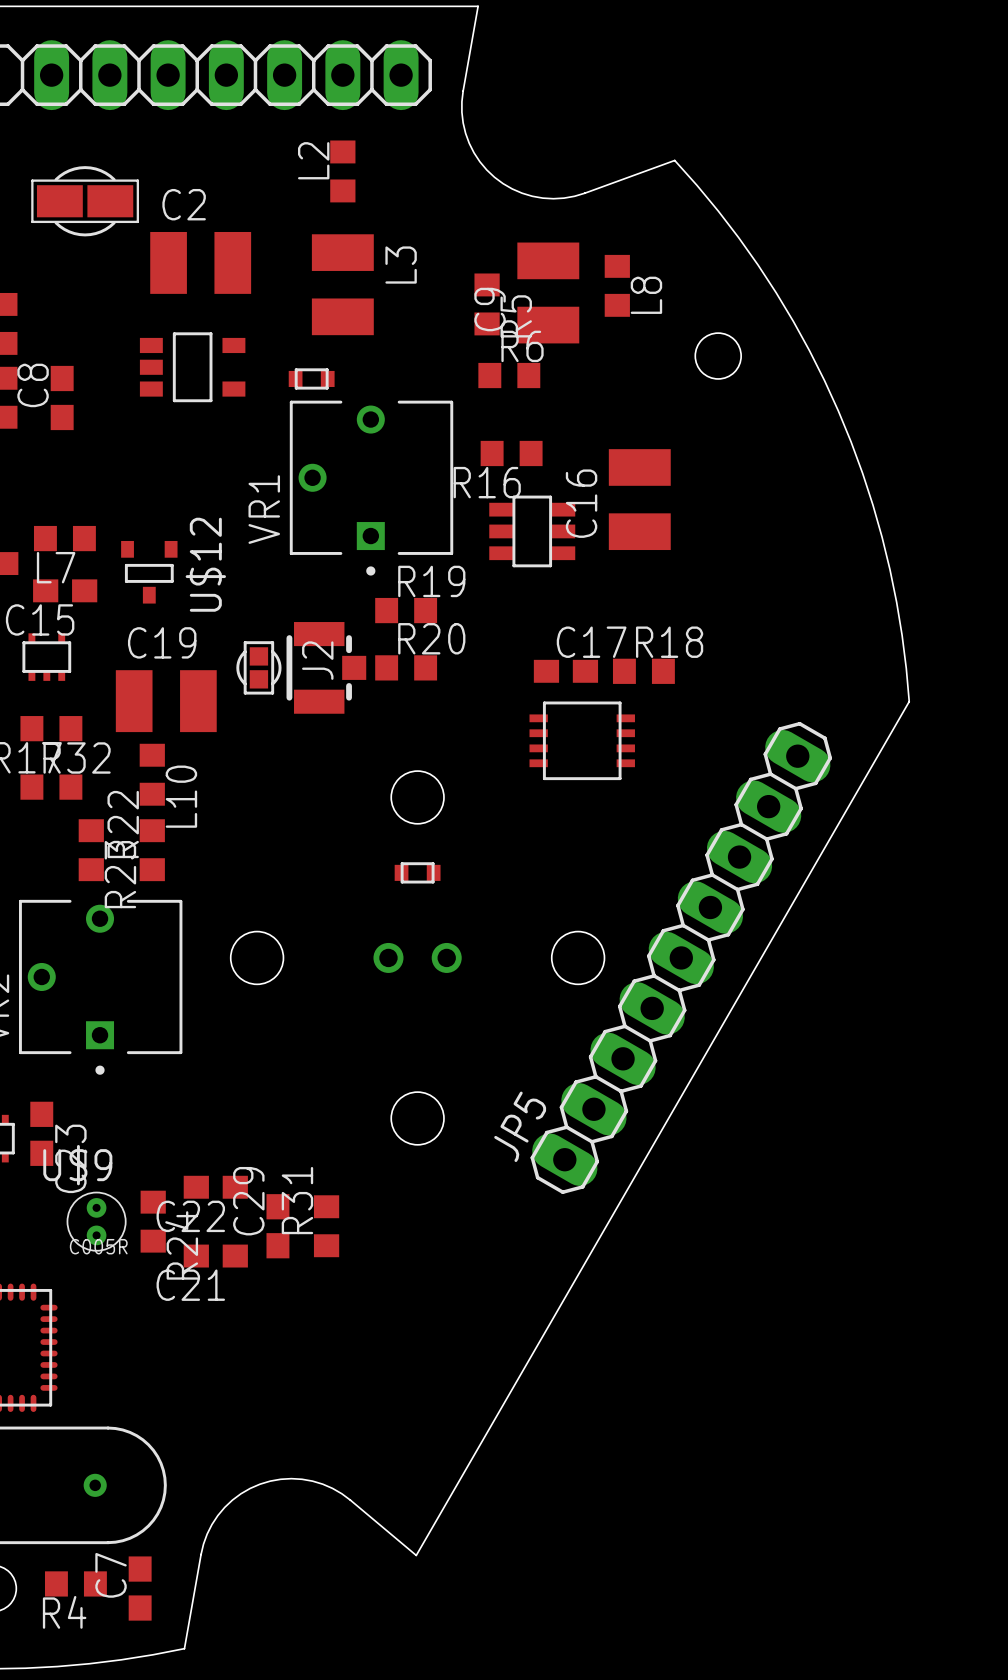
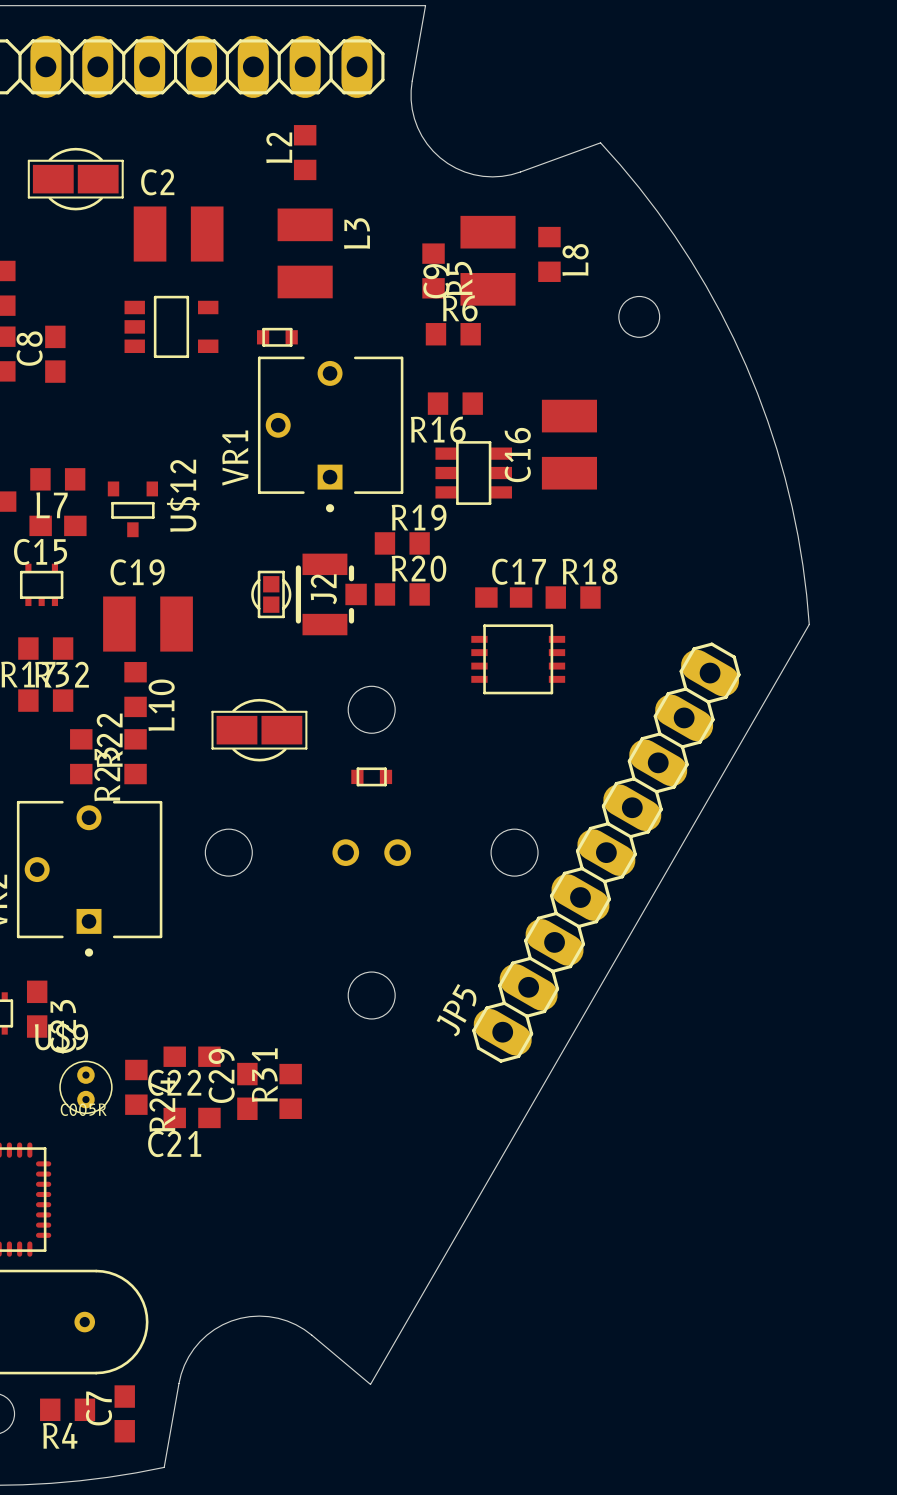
R19 position: (406, 610) -> (402, 543)
part position: (258, 667) -> (271, 594)
J2 position: (326, 667) -> (331, 594)
R20 position: (406, 667) -> (402, 594)
part: none -> (259, 730)

